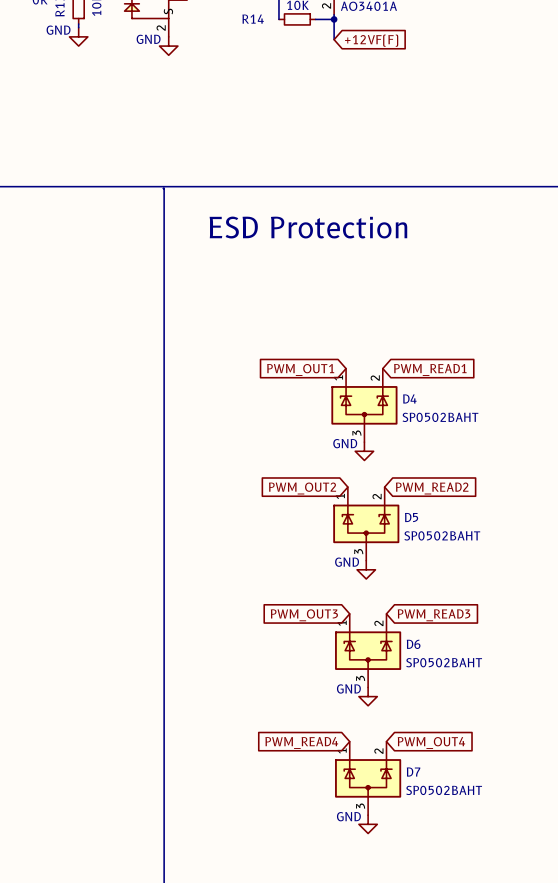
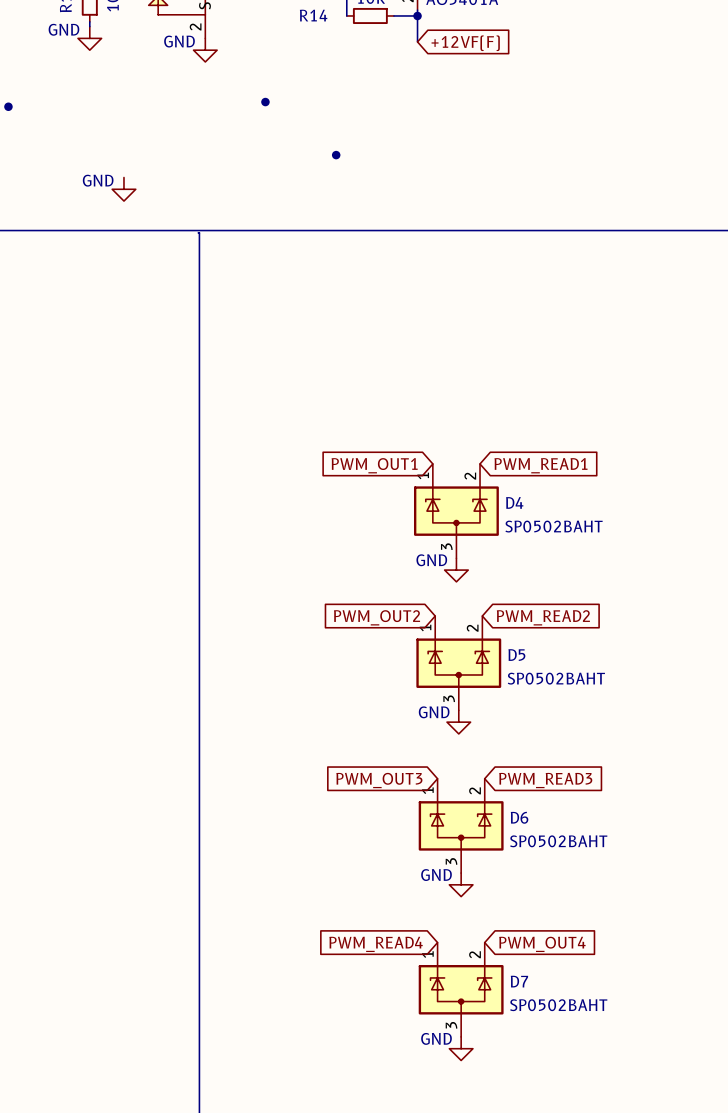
junction: none -> (265, 102)
junction: none -> (8, 106)
junction: none -> (336, 155)
power symbol: none -> GND (123, 189)
text: ESD Protection (308, 227) -> none

